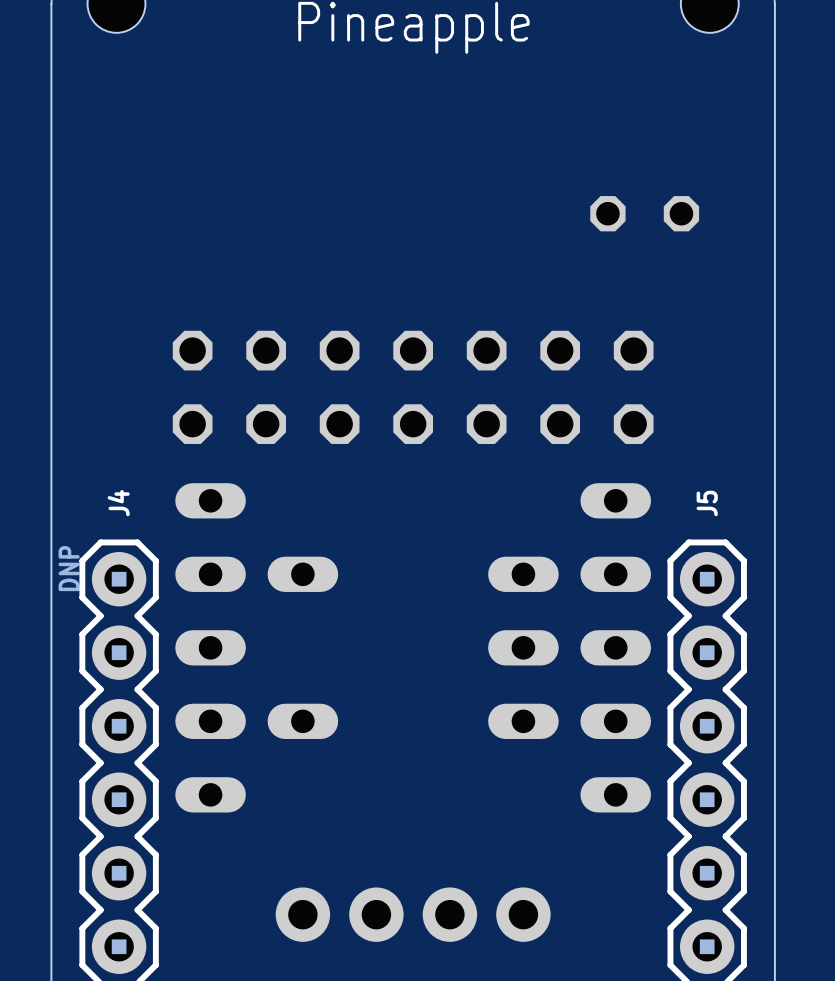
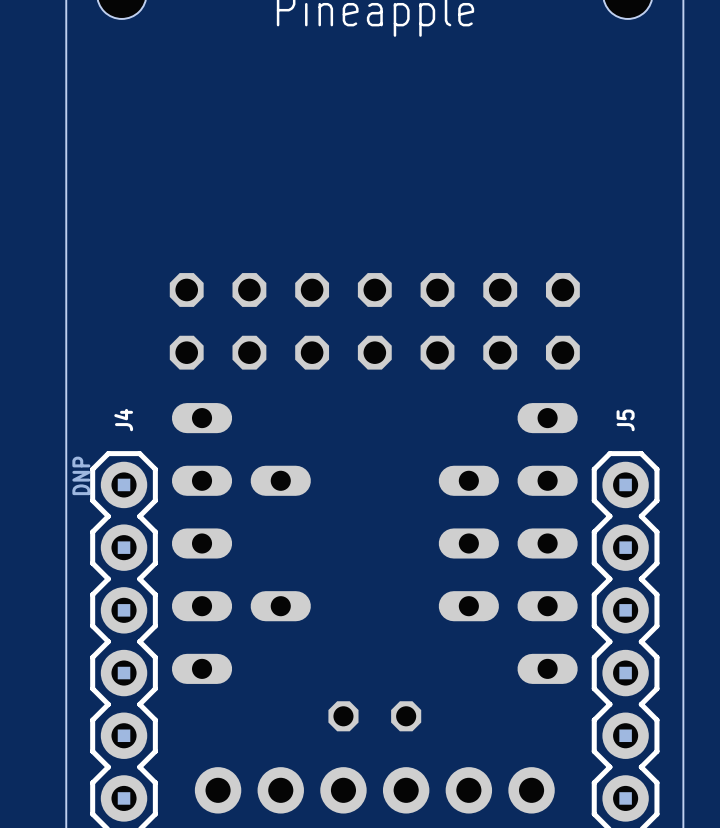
part position: (644, 213) -> (374, 716)
part footprint: [275, 887, 551, 942] -> [194, 767, 555, 814]

